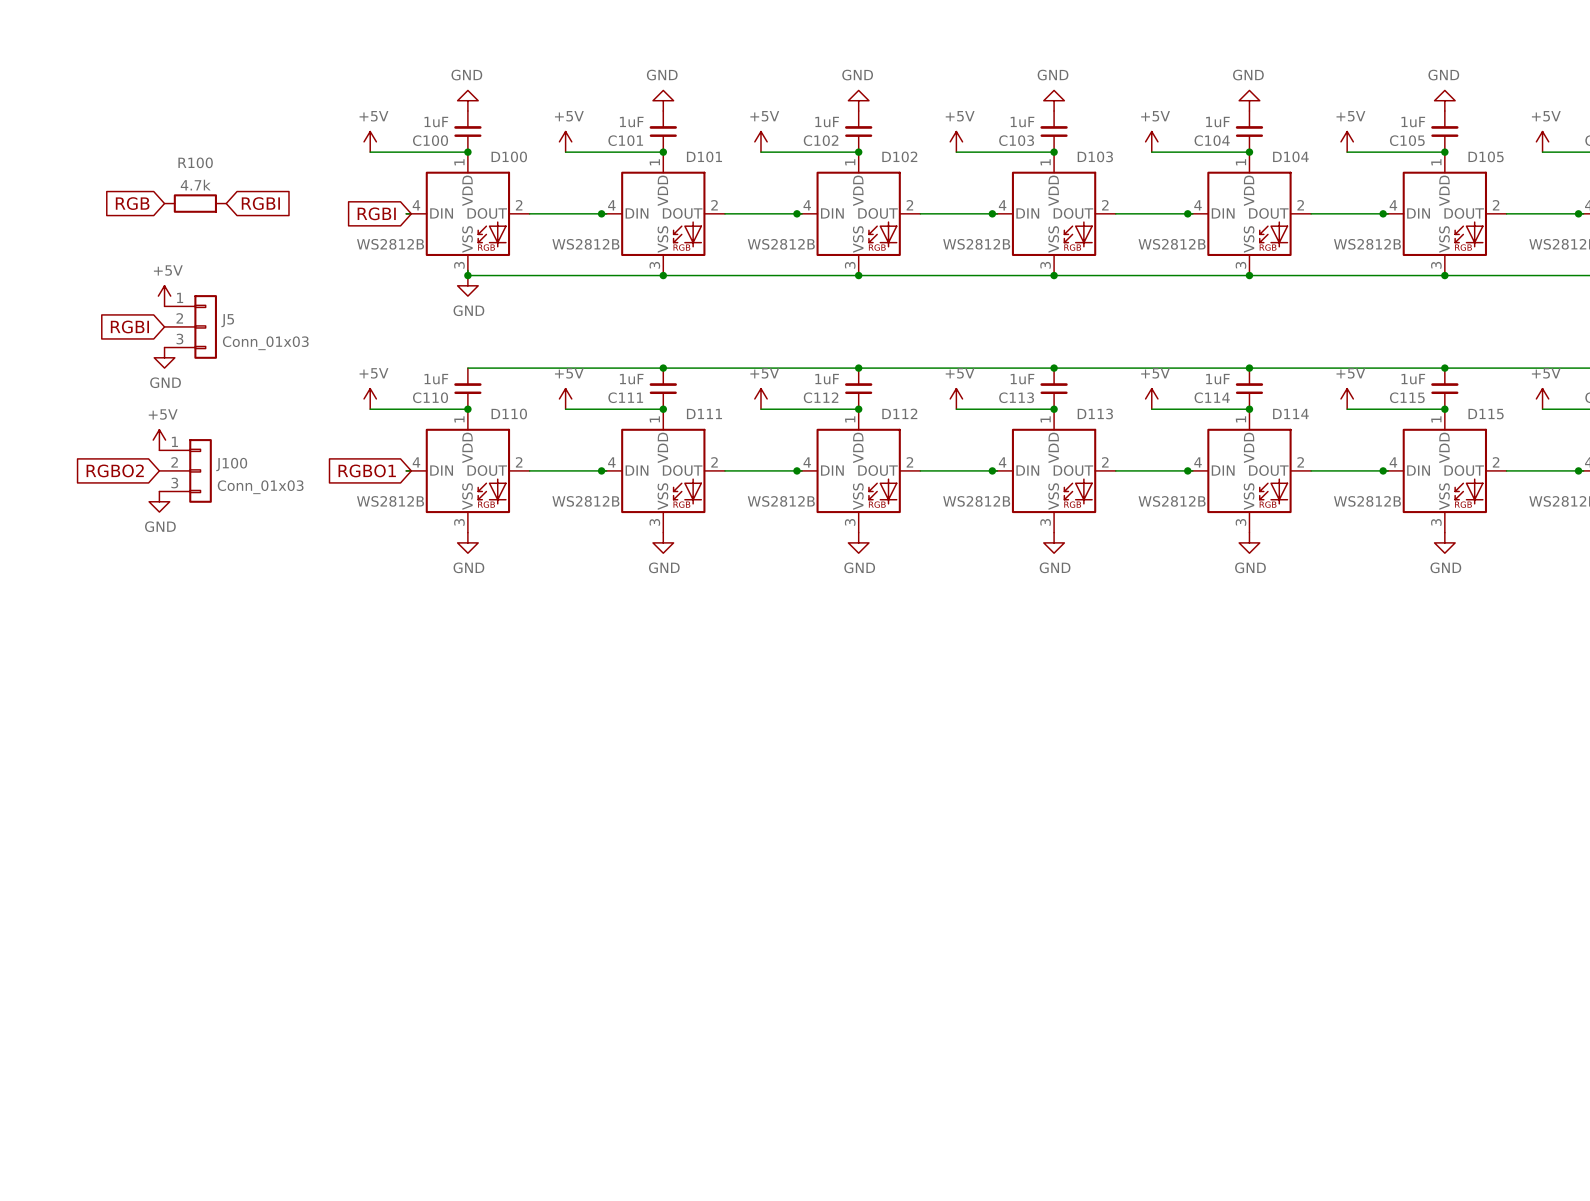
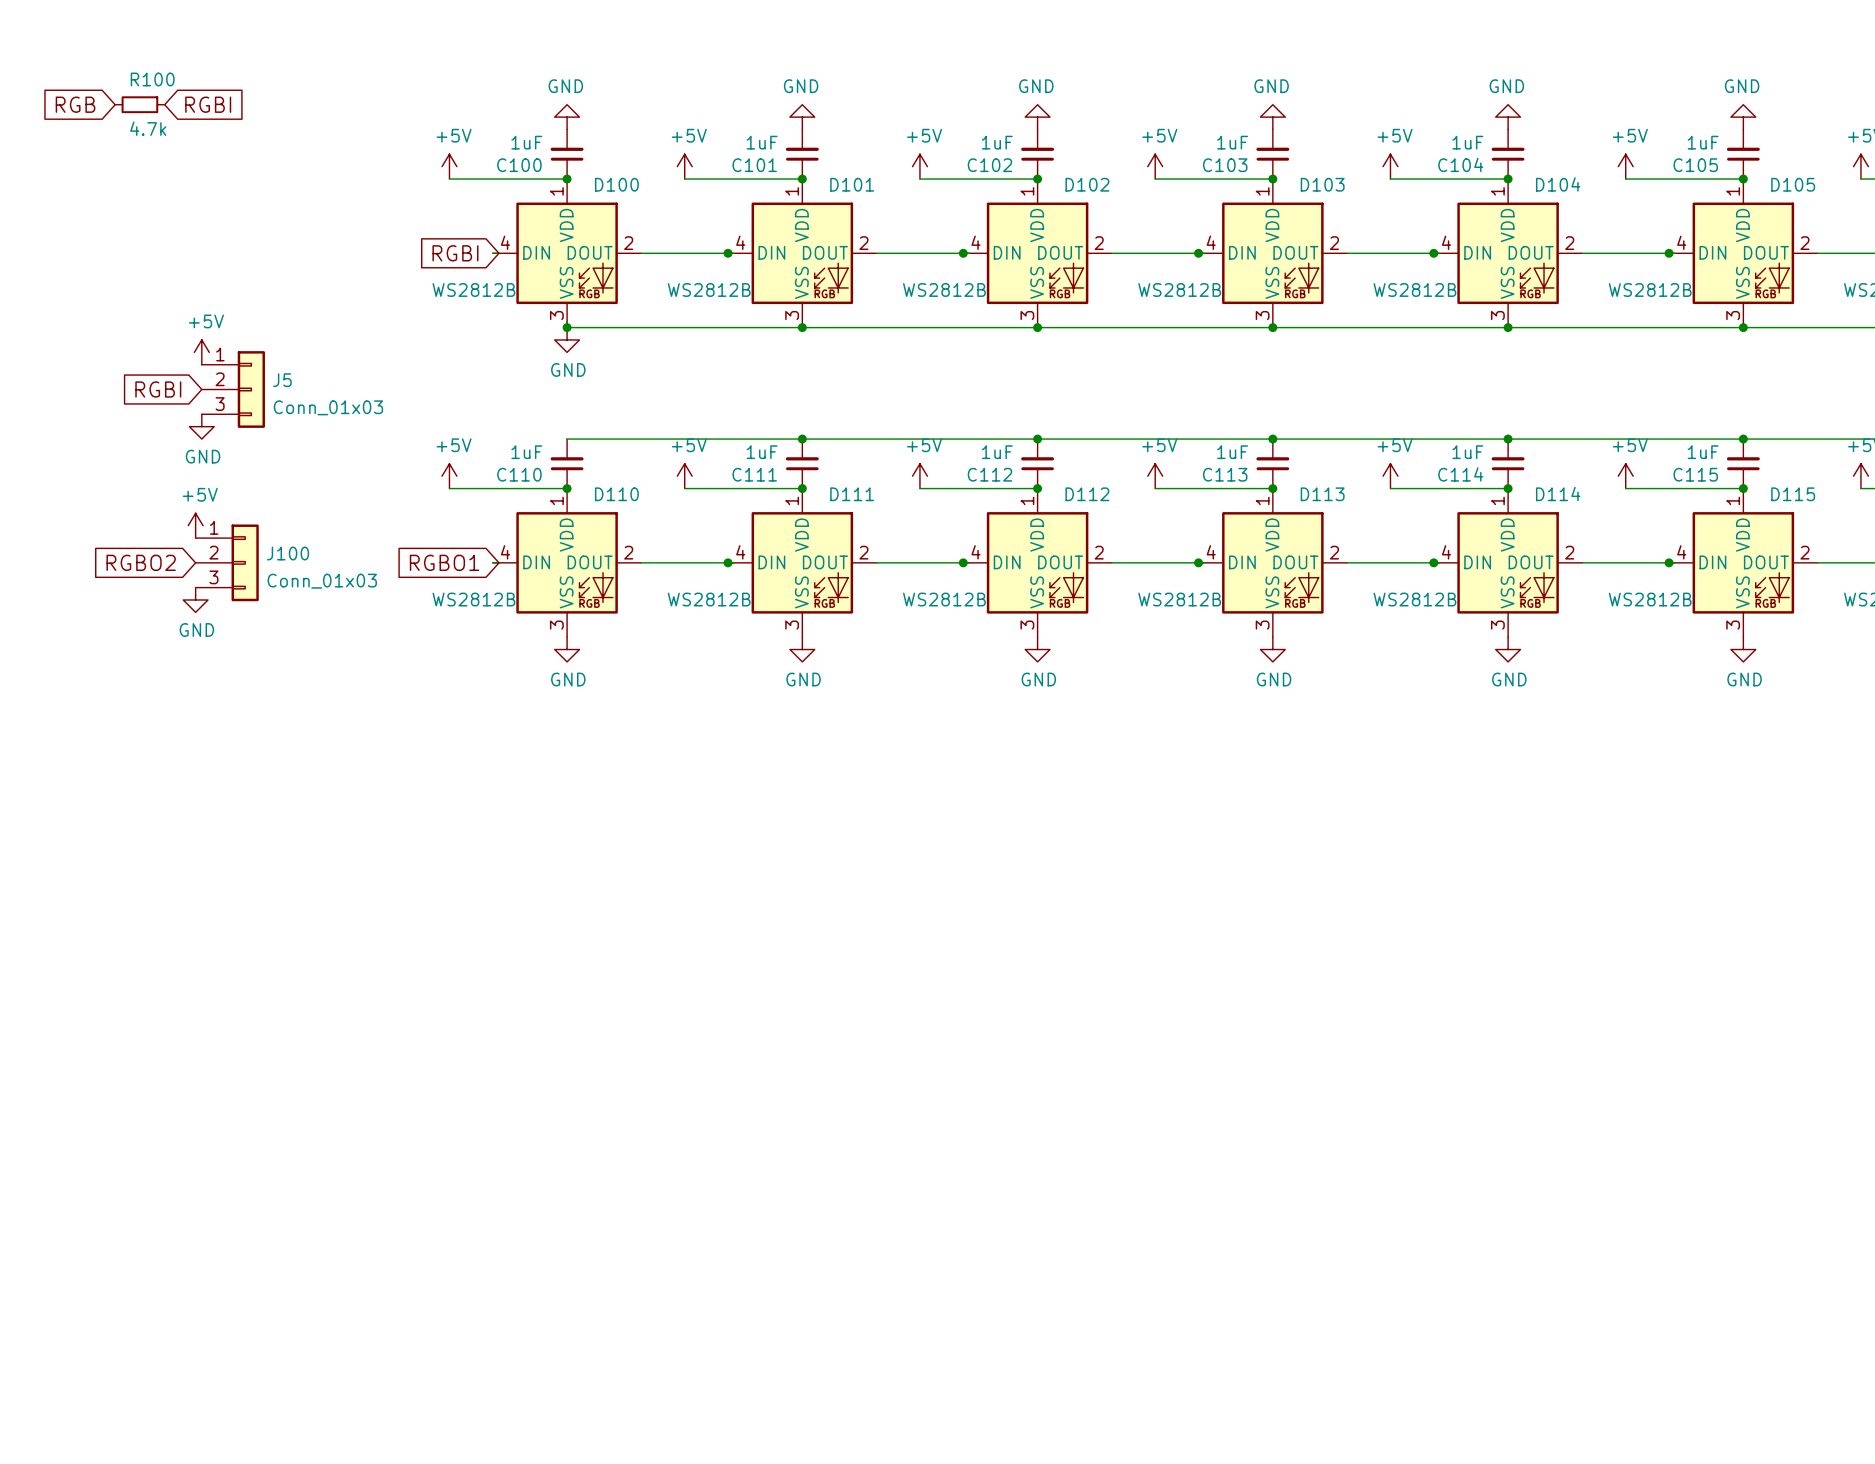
R100 name position: R100 (195, 162) -> R100 (152, 79)
R100 value position: 4.7k (195, 185) -> 4.7k (148, 128)
R100 symbol: [164, 194, 227, 213] -> [115, 96, 165, 114]
global label position: RGB (132, 203) -> RGB (75, 104)
global label position: RGBI (260, 203) -> RGBI (208, 104)

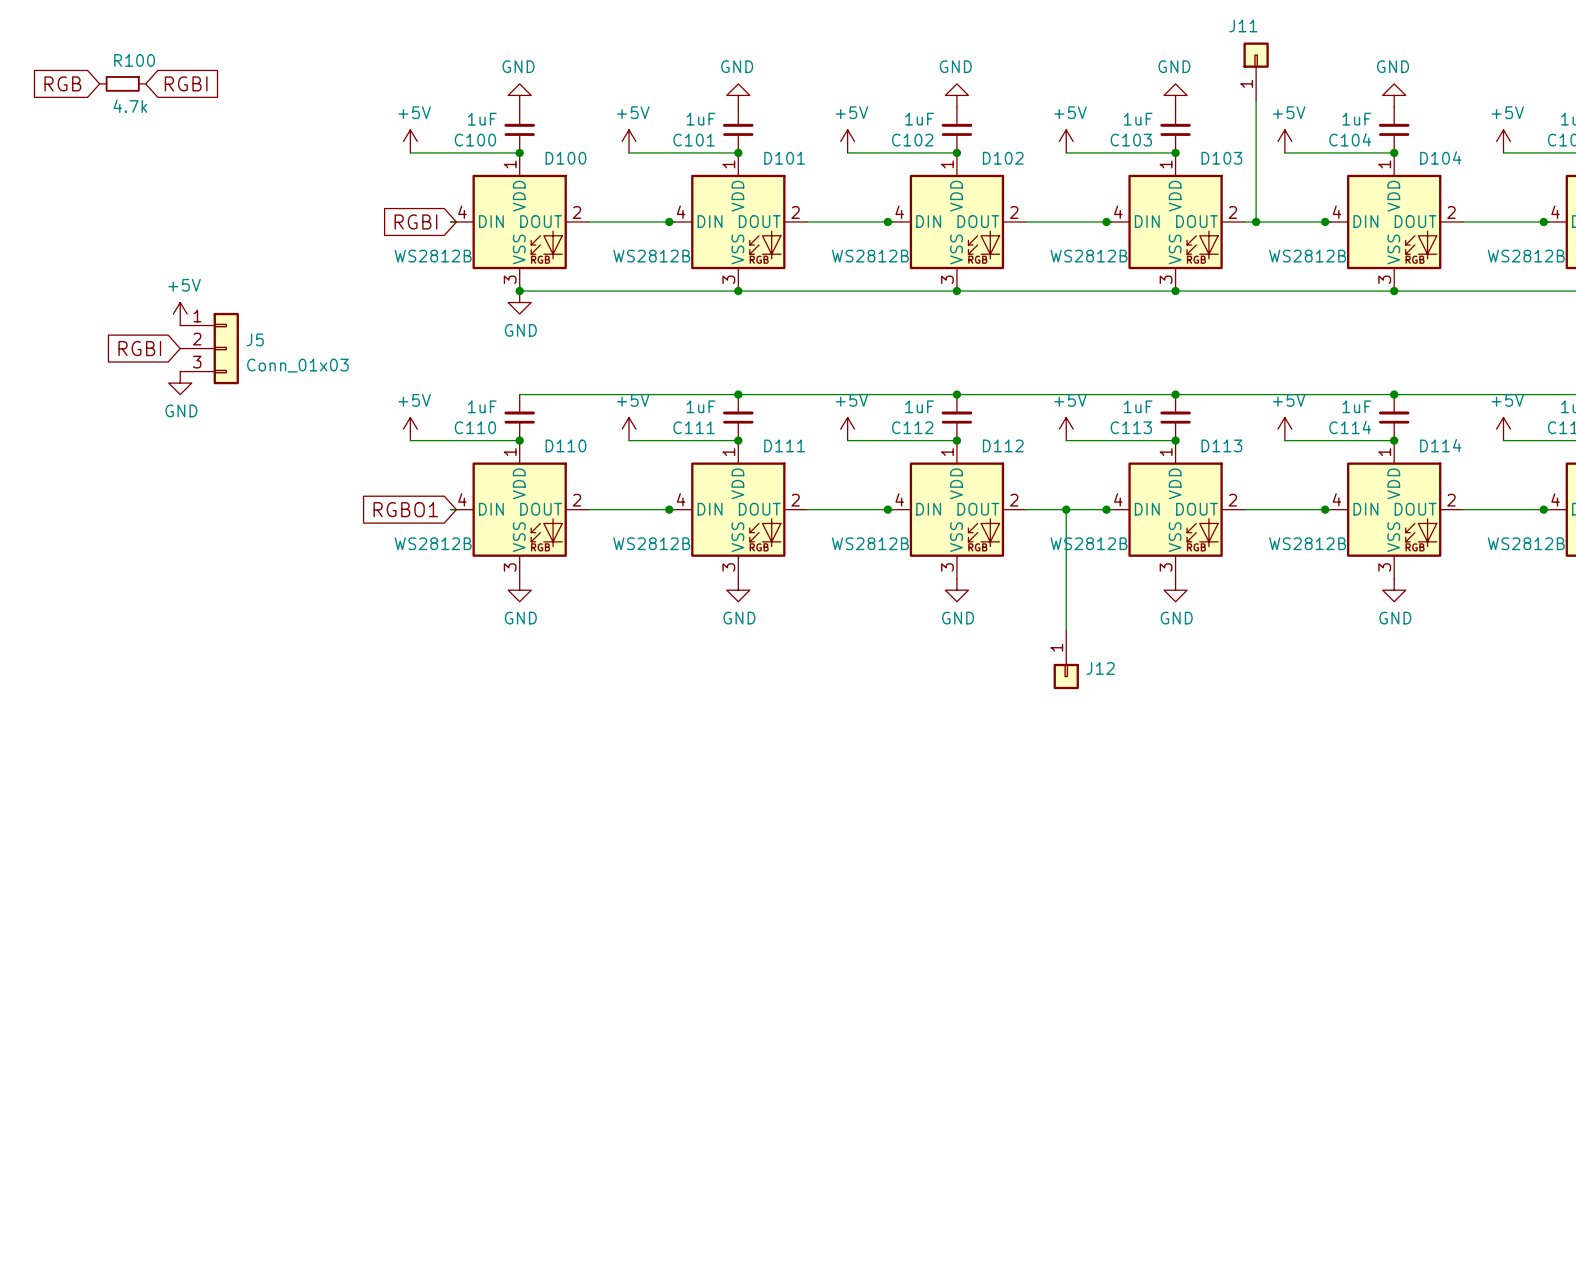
J11: none -> (1256, 71)
wire: none -> (1256, 101) (1256, 221)
junction: none -> (1256, 221)
power symbol: +5V (195, 525) -> none
global label: RGBO2 (141, 562) -> none
J100: Conn_01x03 (227, 562) -> none
wire: none -> (1066, 509) (1066, 630)
junction: none -> (1066, 509)
power symbol: GND (195, 600) -> none
J12: none -> (1066, 659)

